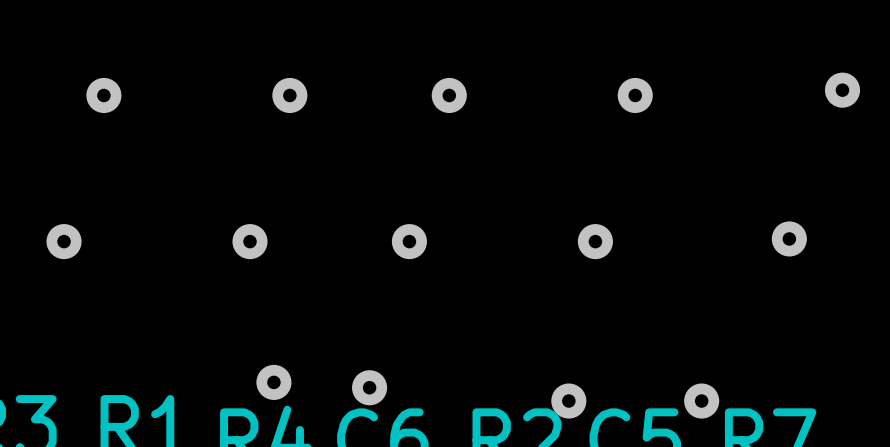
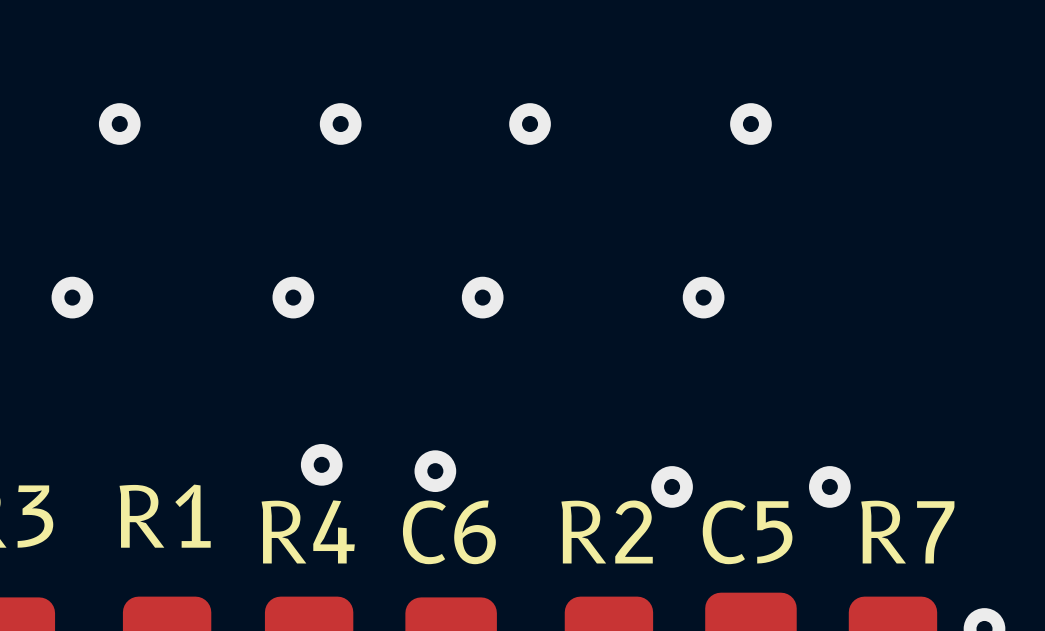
via: (842, 90) -> none
via: (789, 238) -> none

